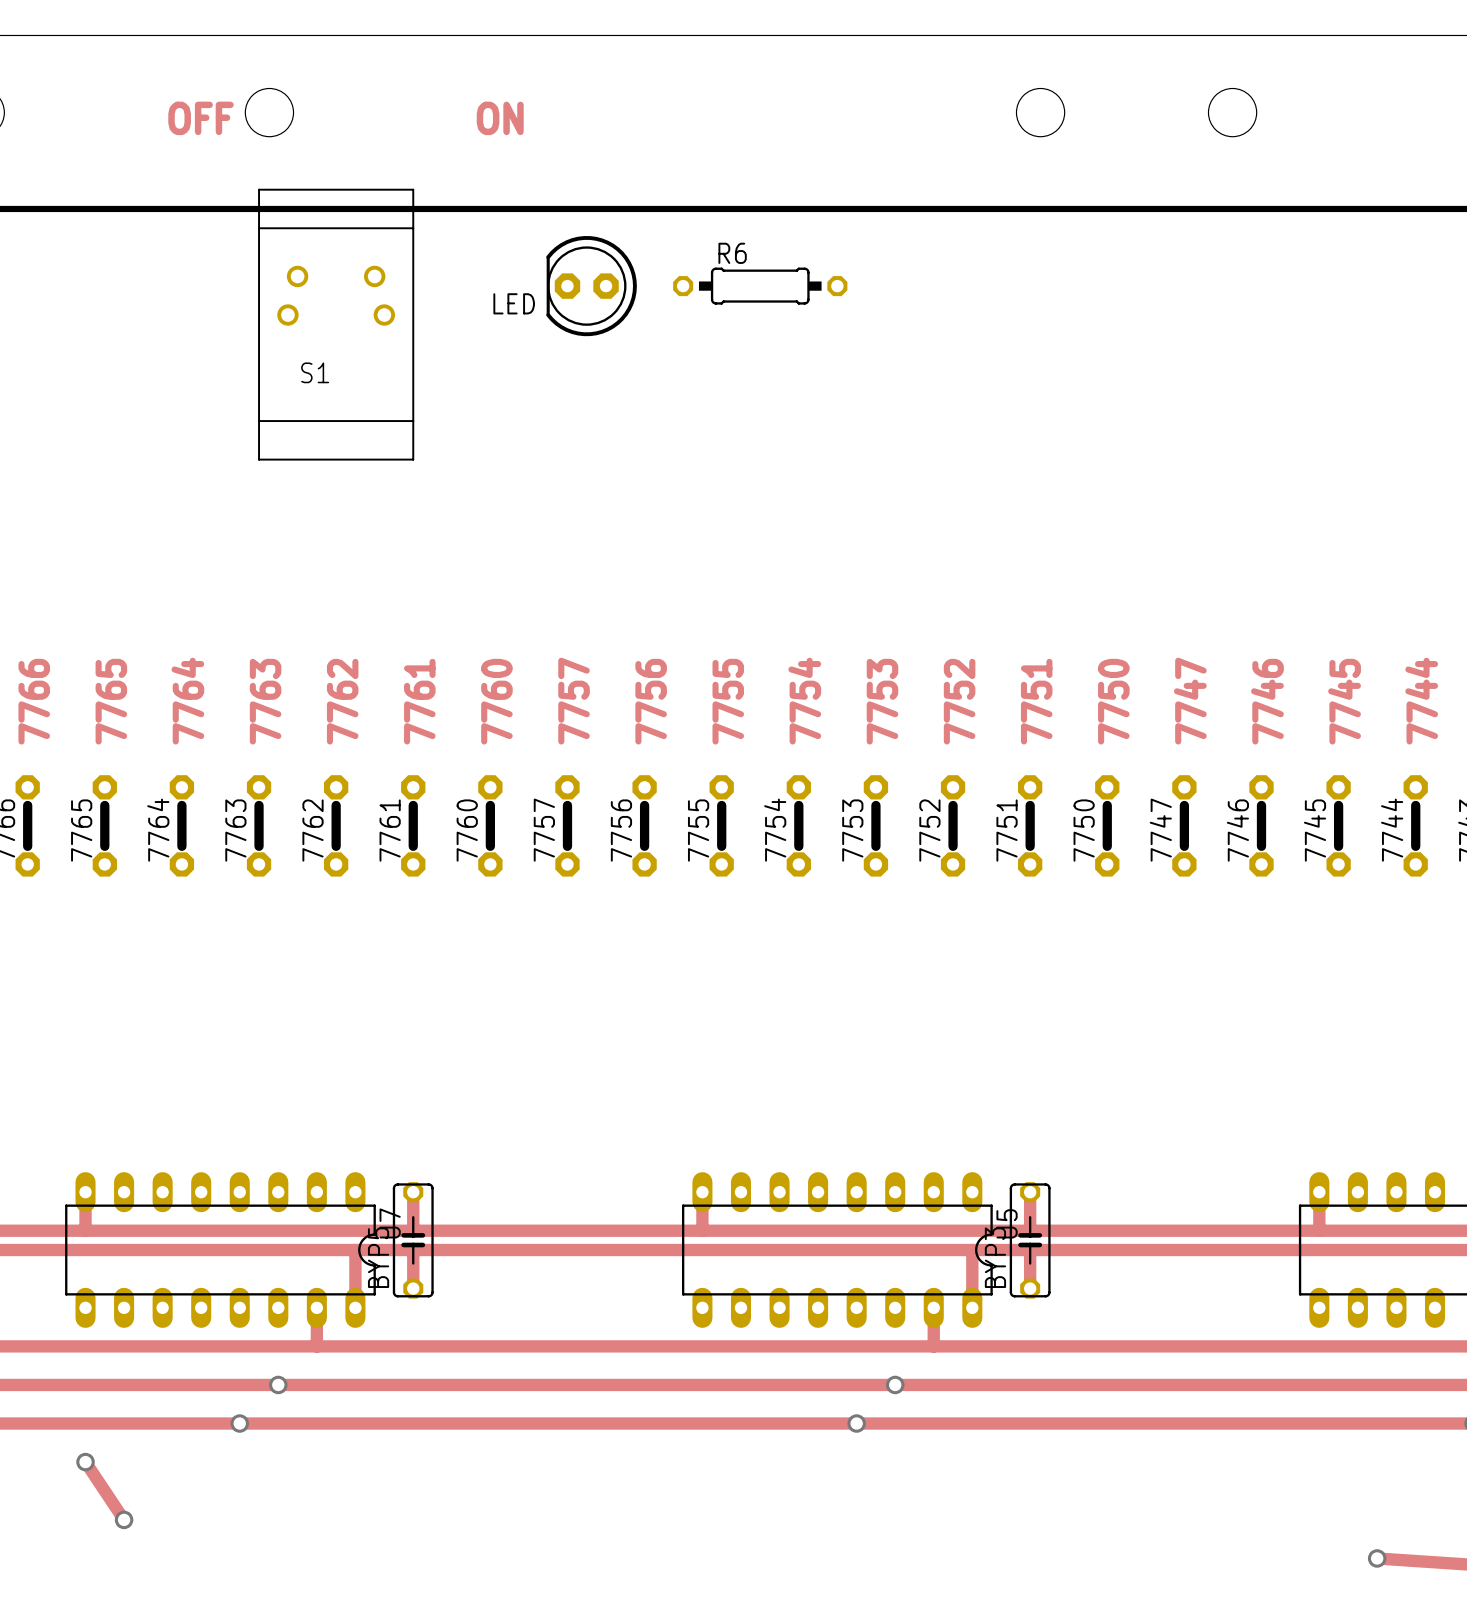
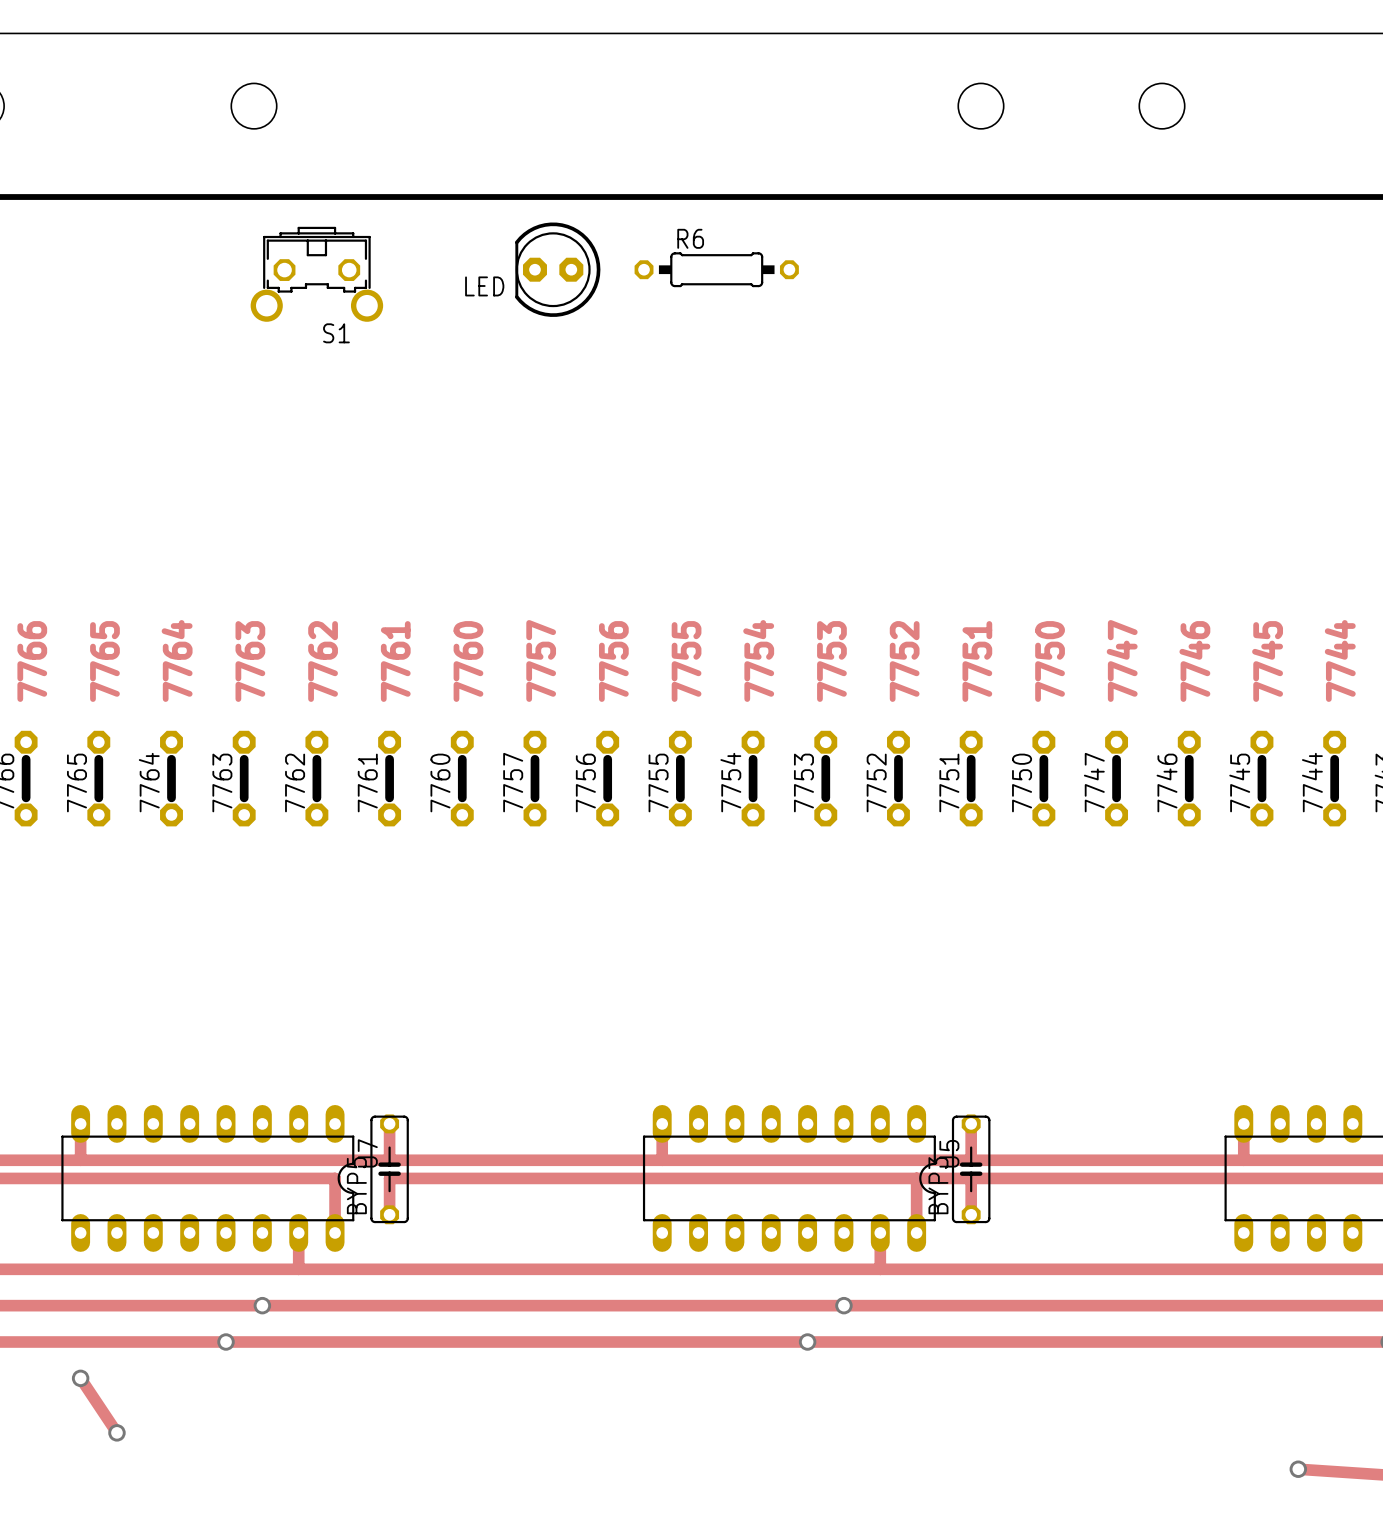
text: OFF (201, 118) -> none
text: ON (500, 118) -> none
S1 footprint: [258, 188, 415, 461] -> [250, 226, 384, 322]
S1 name position: S1 (315, 372) -> S1 (336, 333)
track: (355, 1250) (413, 1250) -> none

